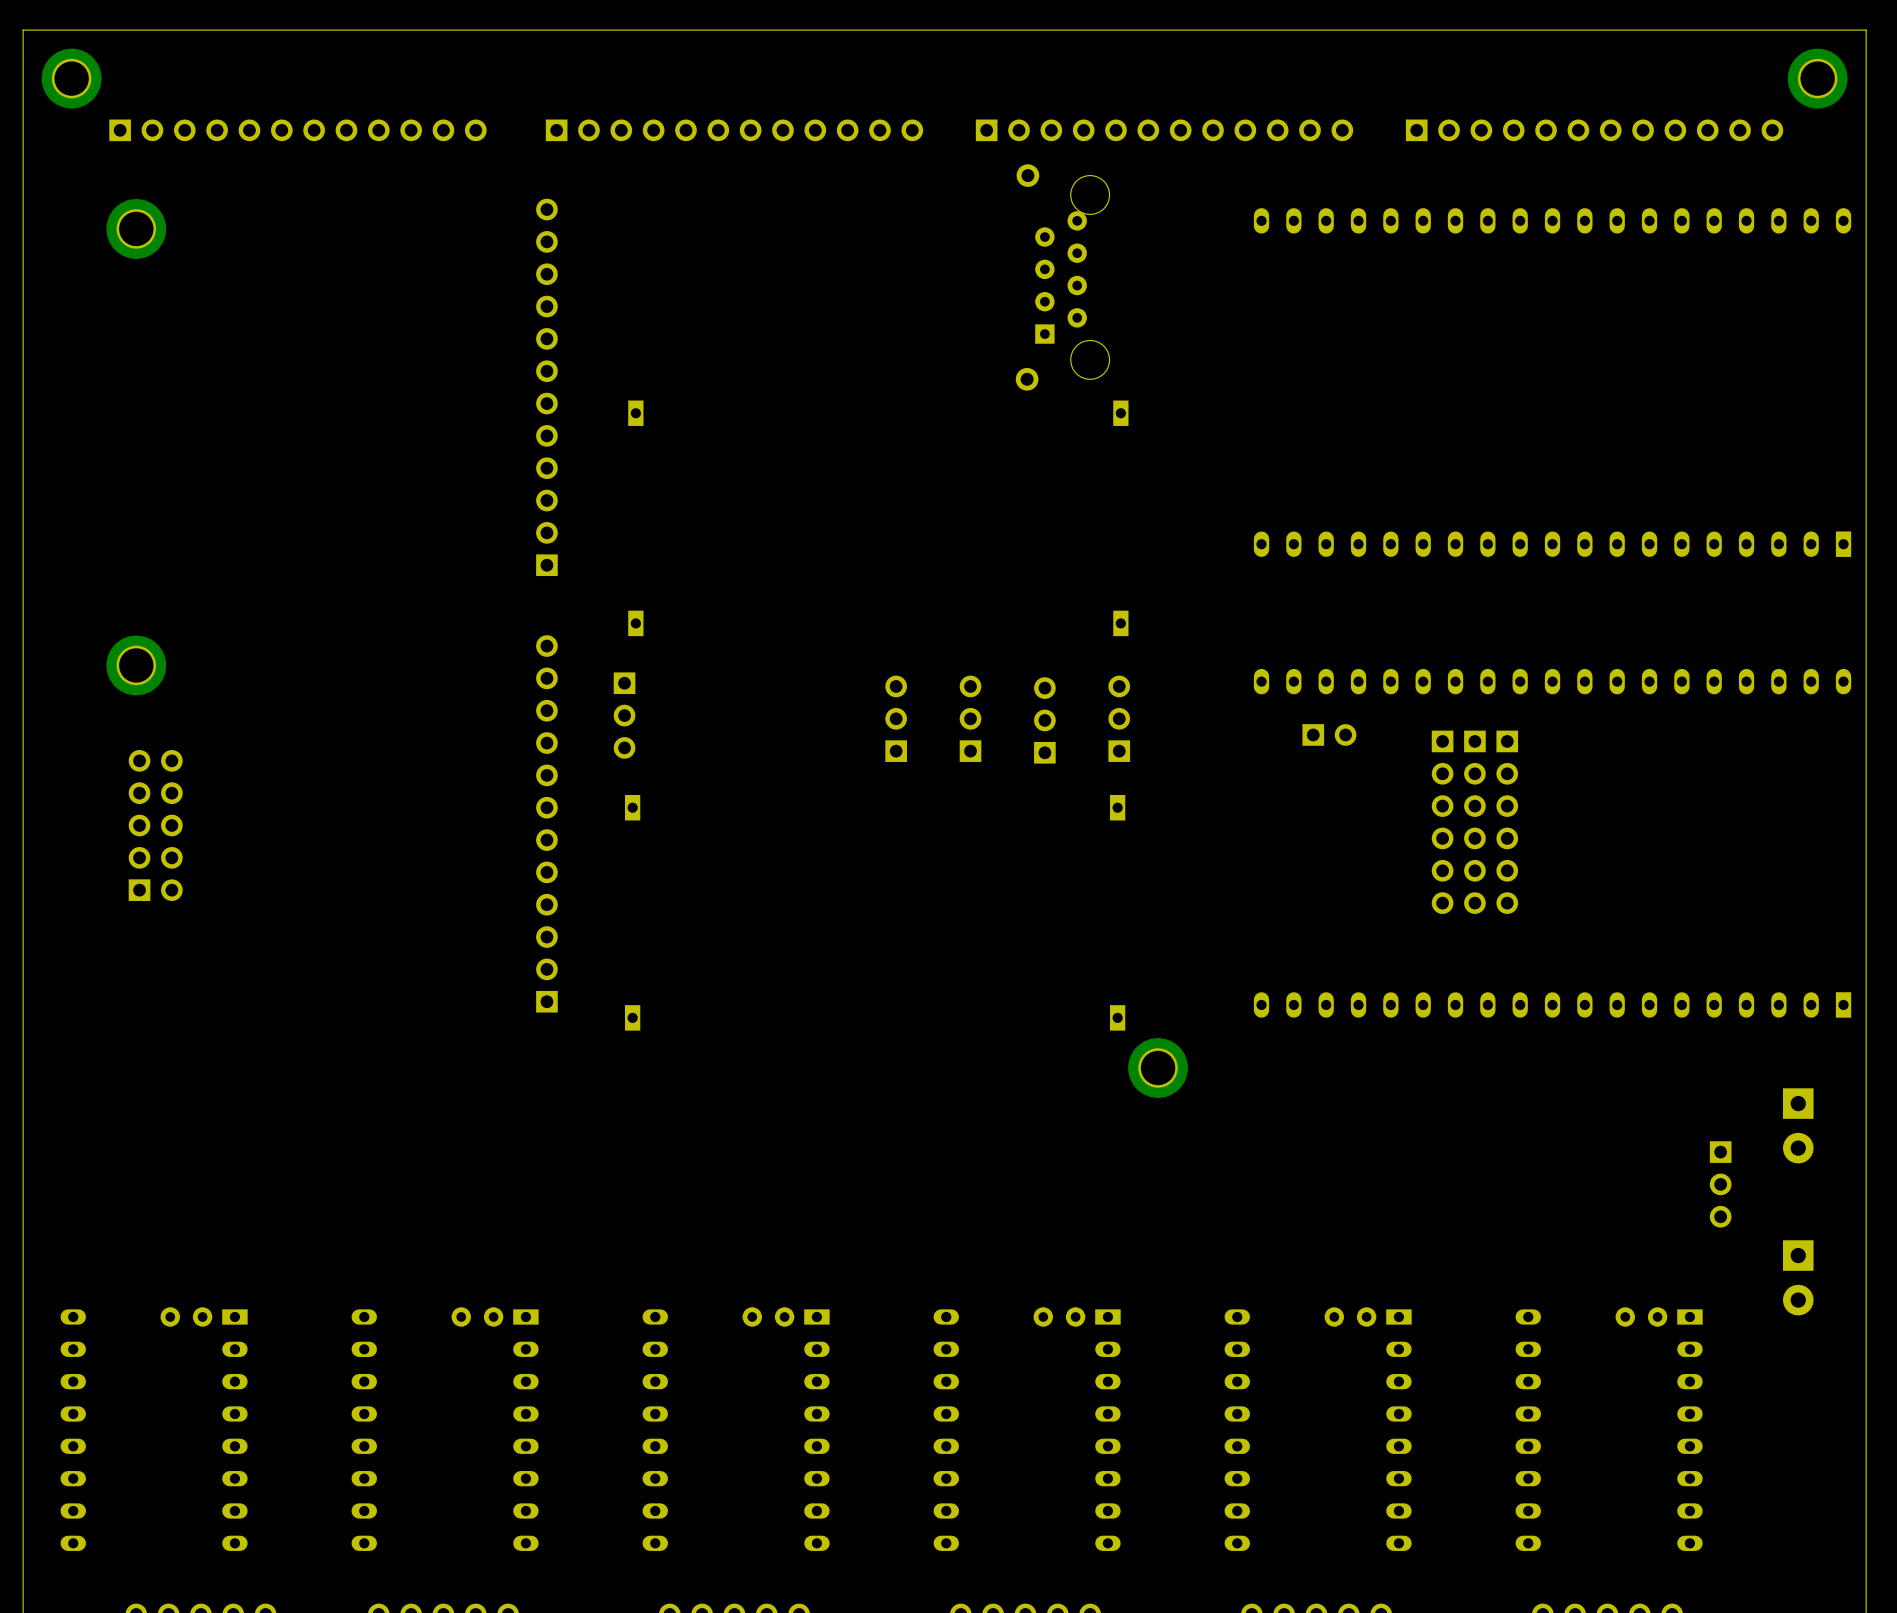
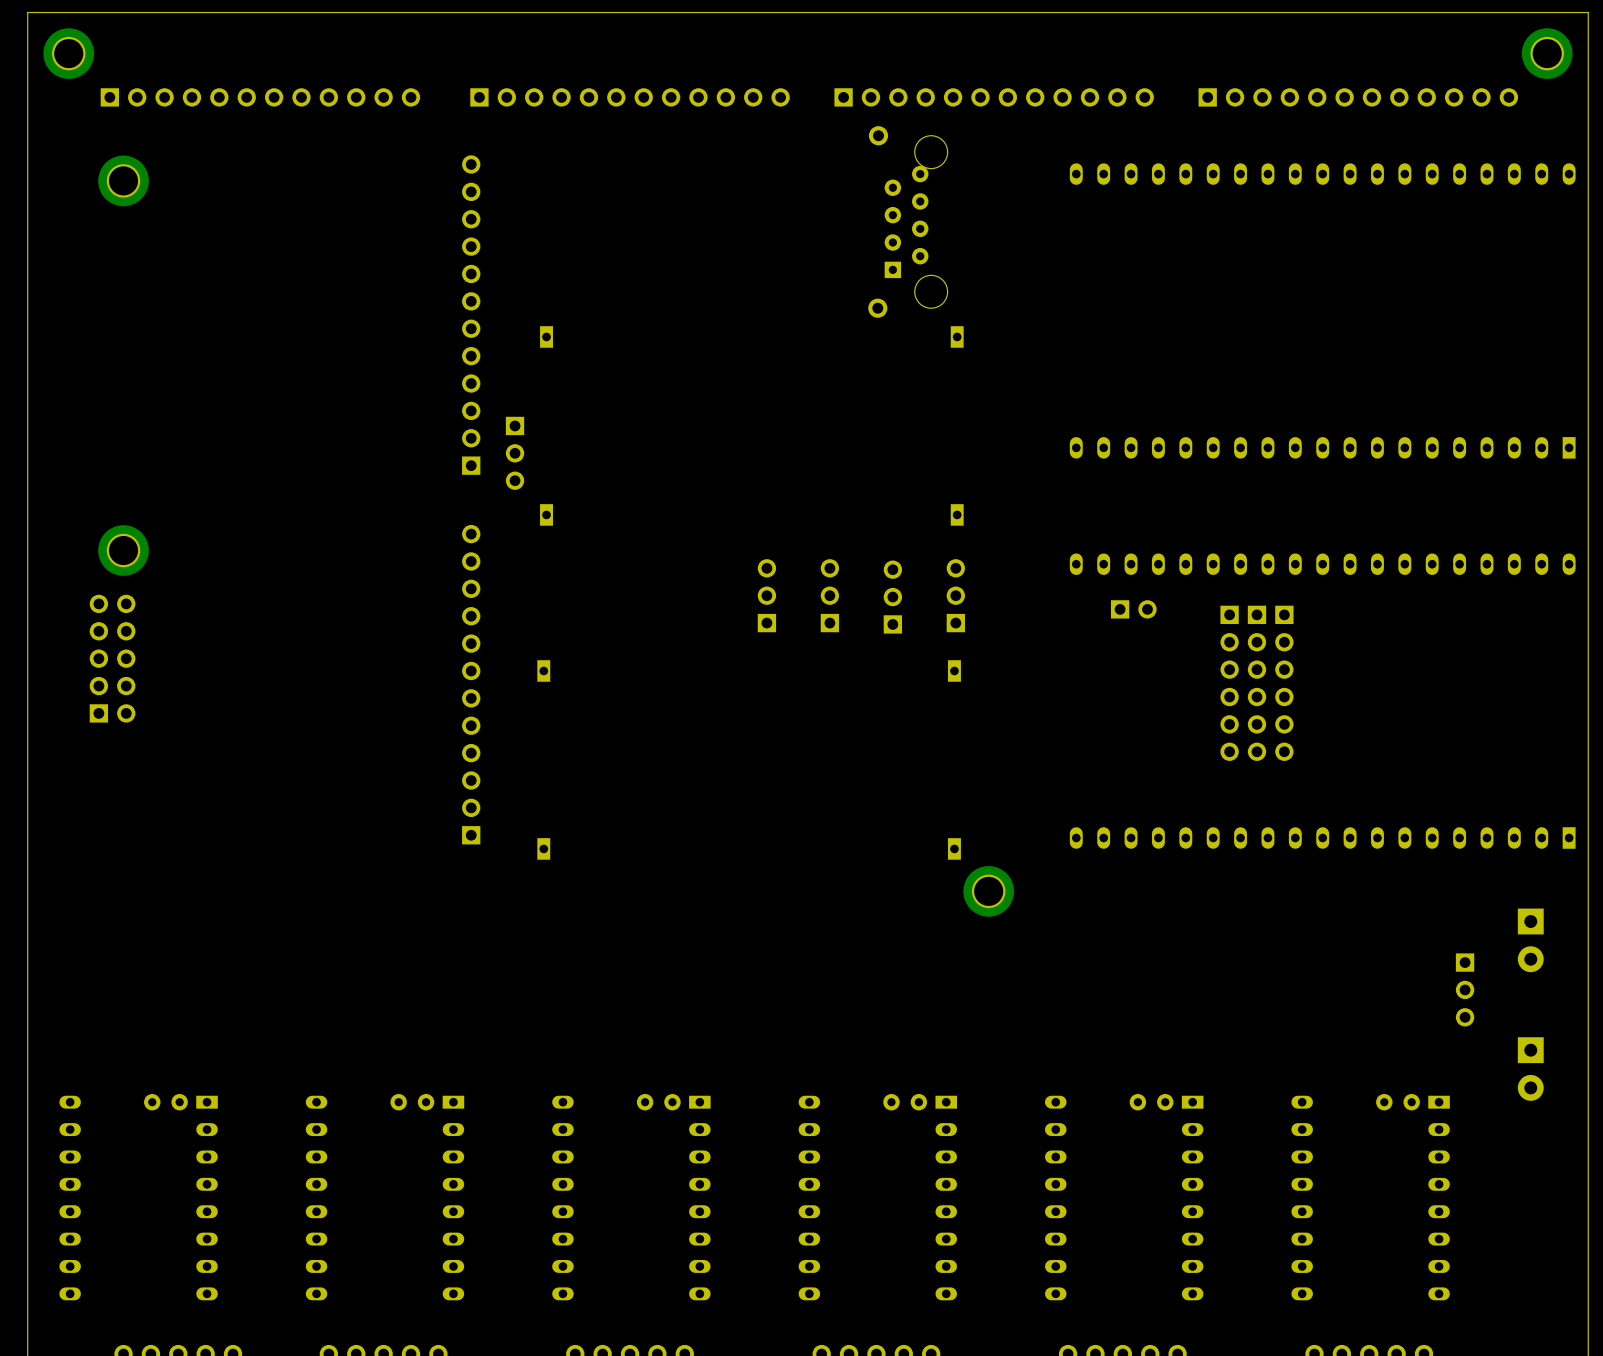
part position: (624, 715) -> (515, 453)
part position: (155, 825) -> (112, 658)

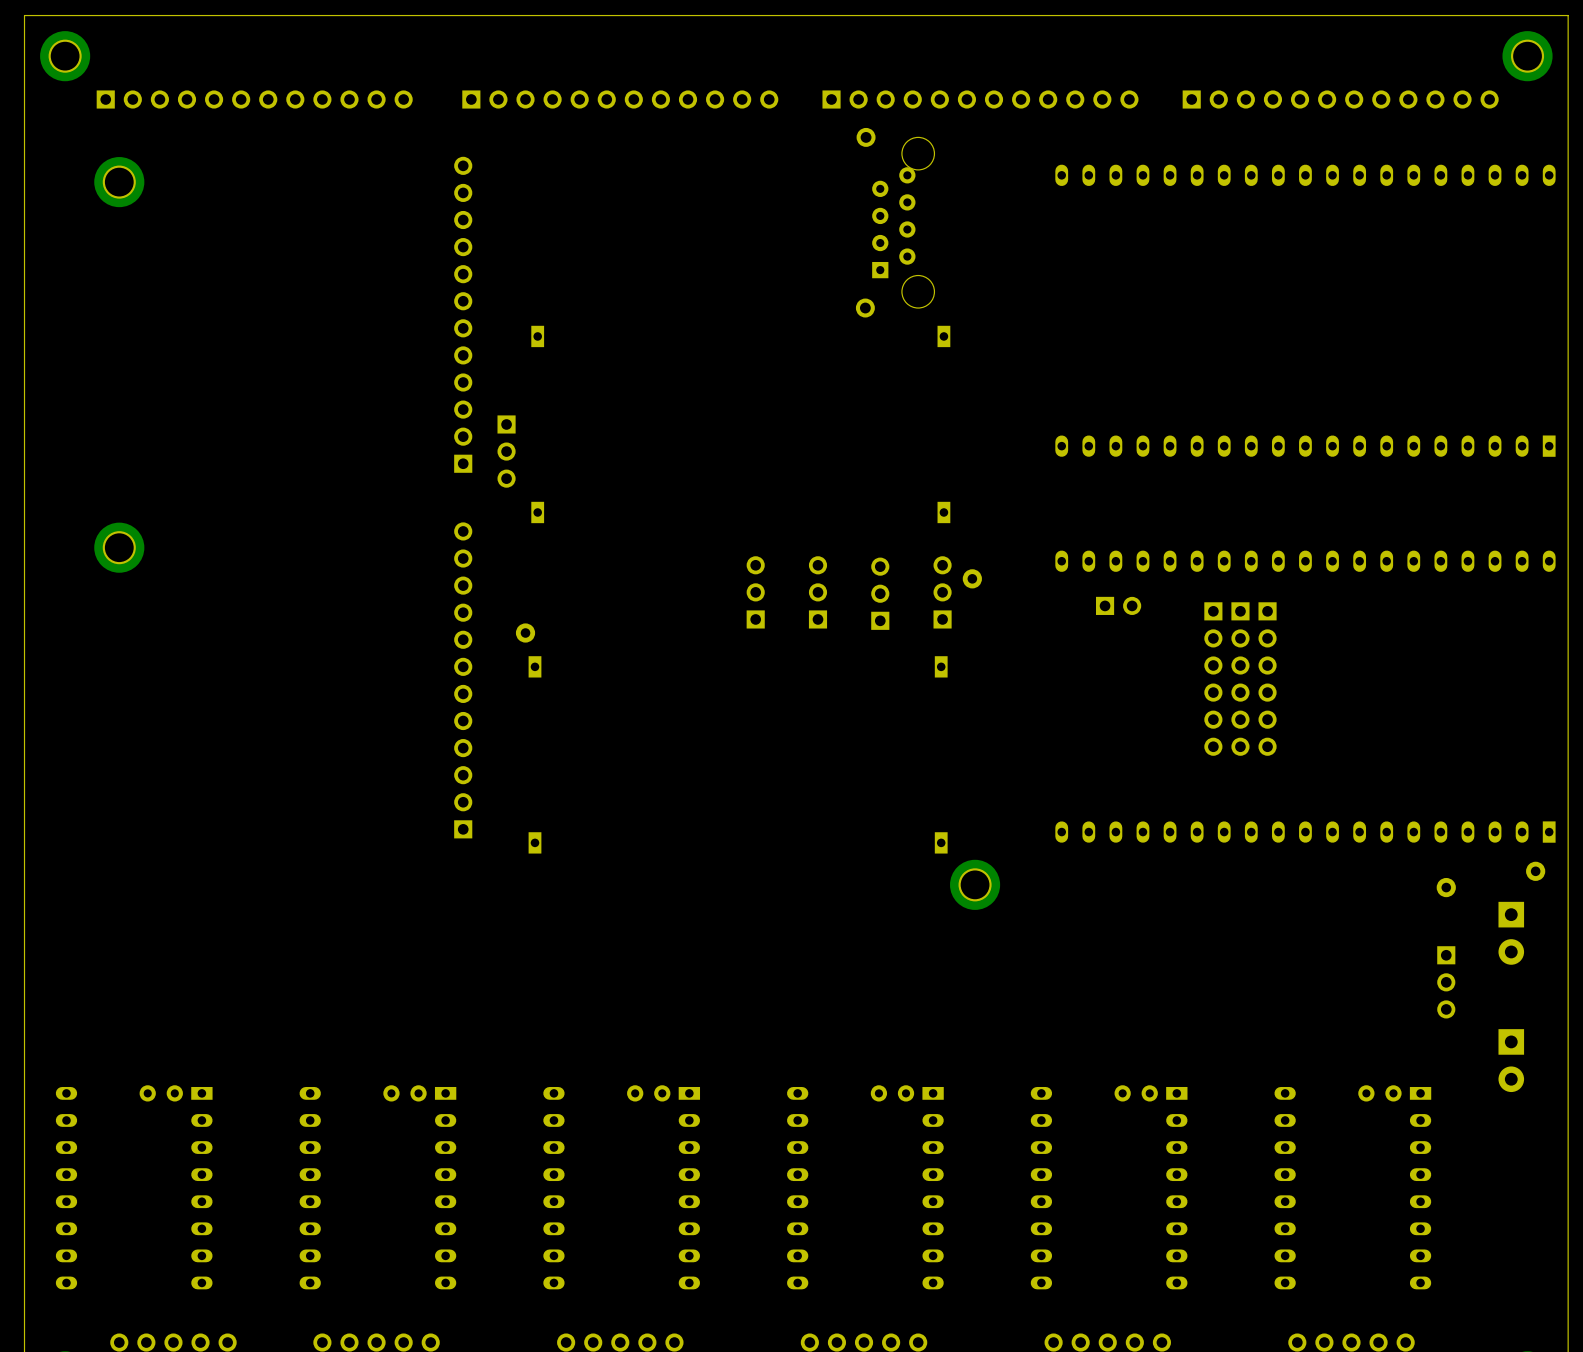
part: none -> (972, 578)
part: none -> (525, 633)
part: (112, 658) -> none
part: none -> (1535, 871)
part: none -> (1446, 887)

